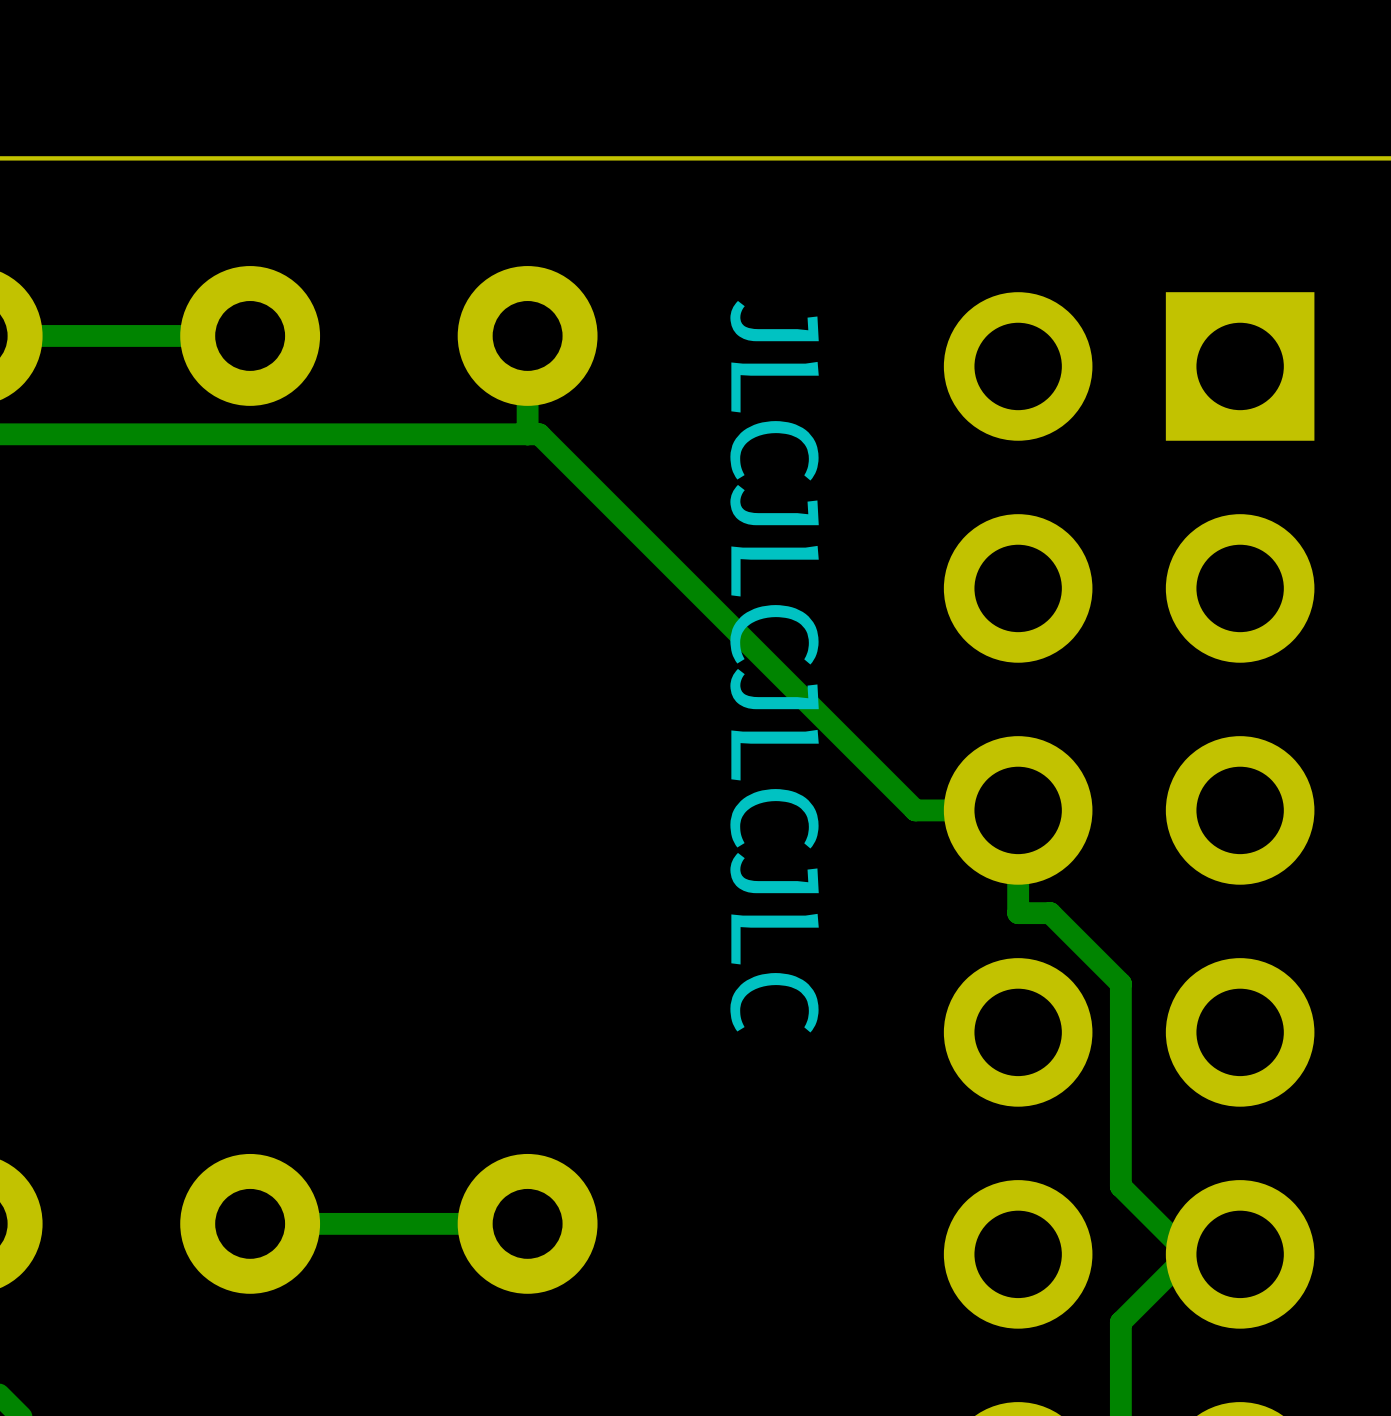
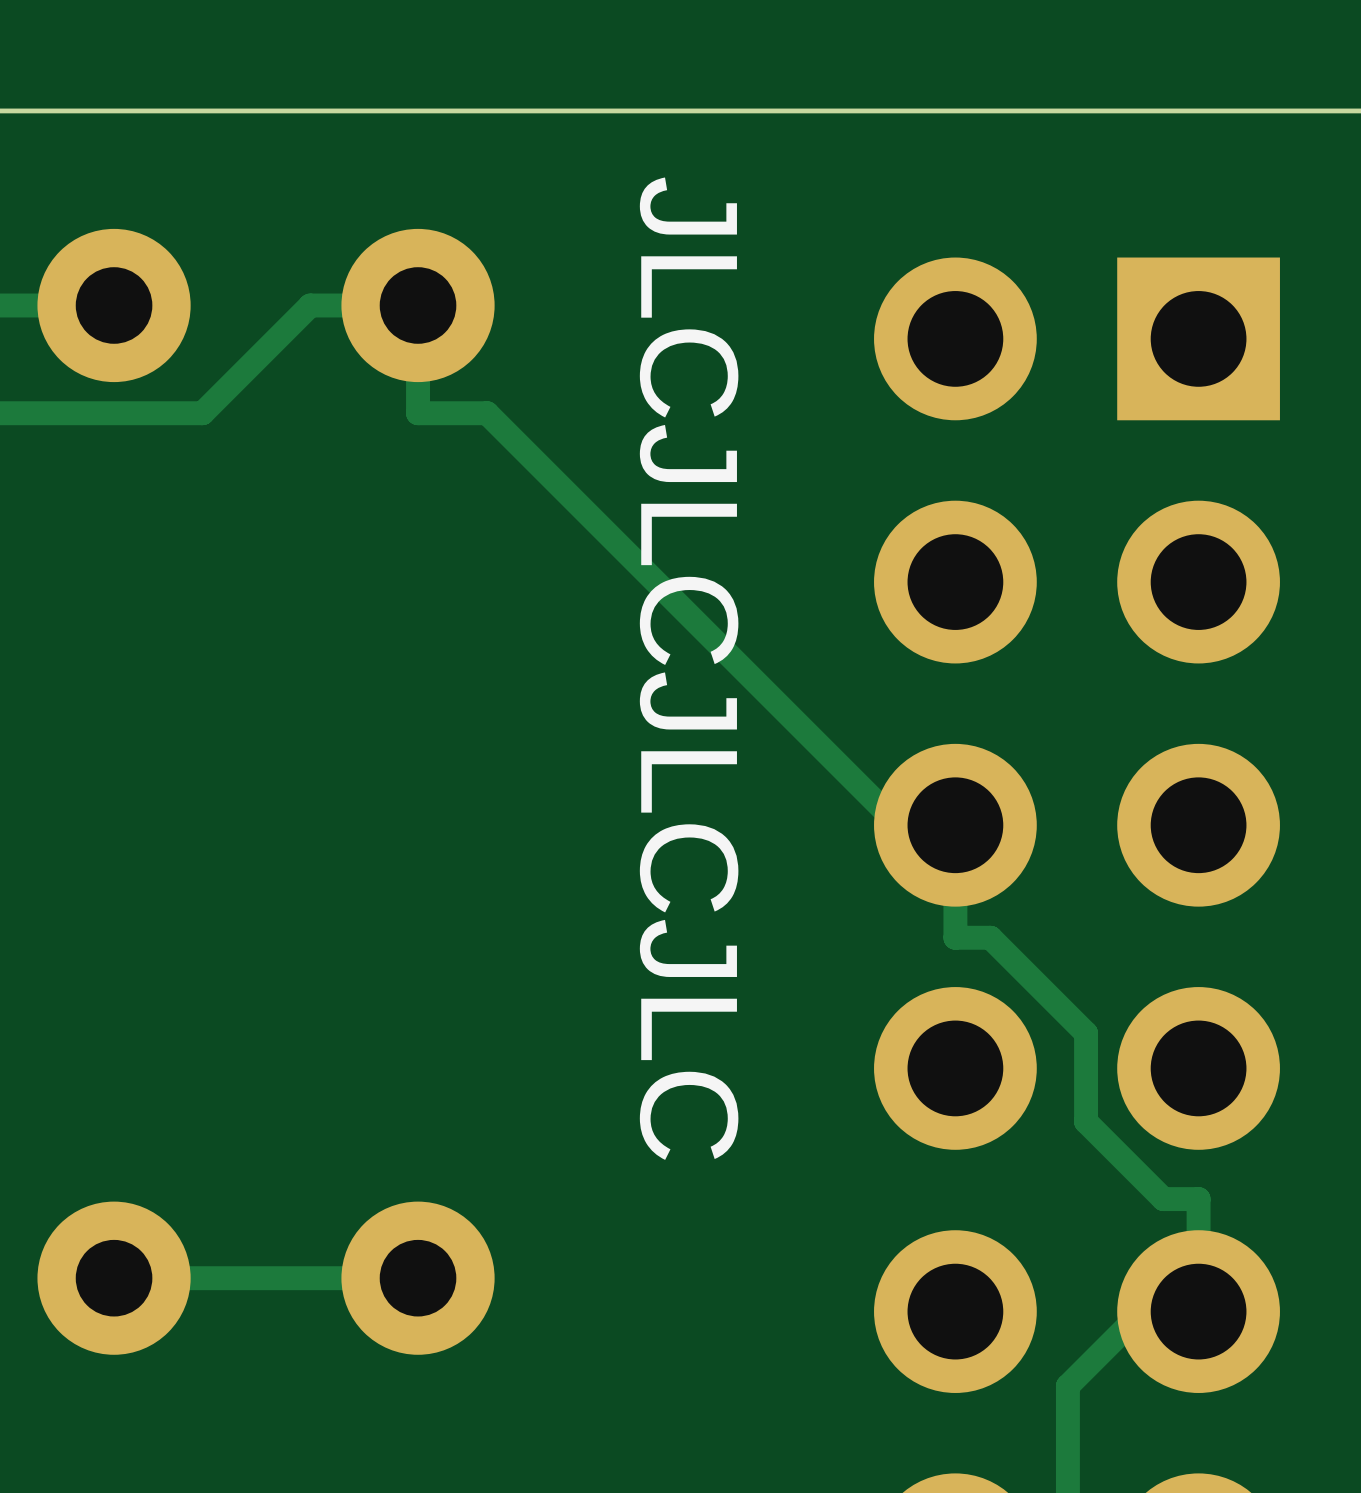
track: (527, 434) (330, 434) -> (418, 305) (310, 305) (202, 413)
track: (539, 434) (915, 810) (1018, 810) -> (430, 413) (487, 413) (955, 881)
track: (1120, 983) (1120, 1186) (1188, 1254) (1240, 1254) -> (1067, 1015) (1086, 1033) (1086, 1121) (1163, 1199) (1198, 1199) (1198, 1311)

